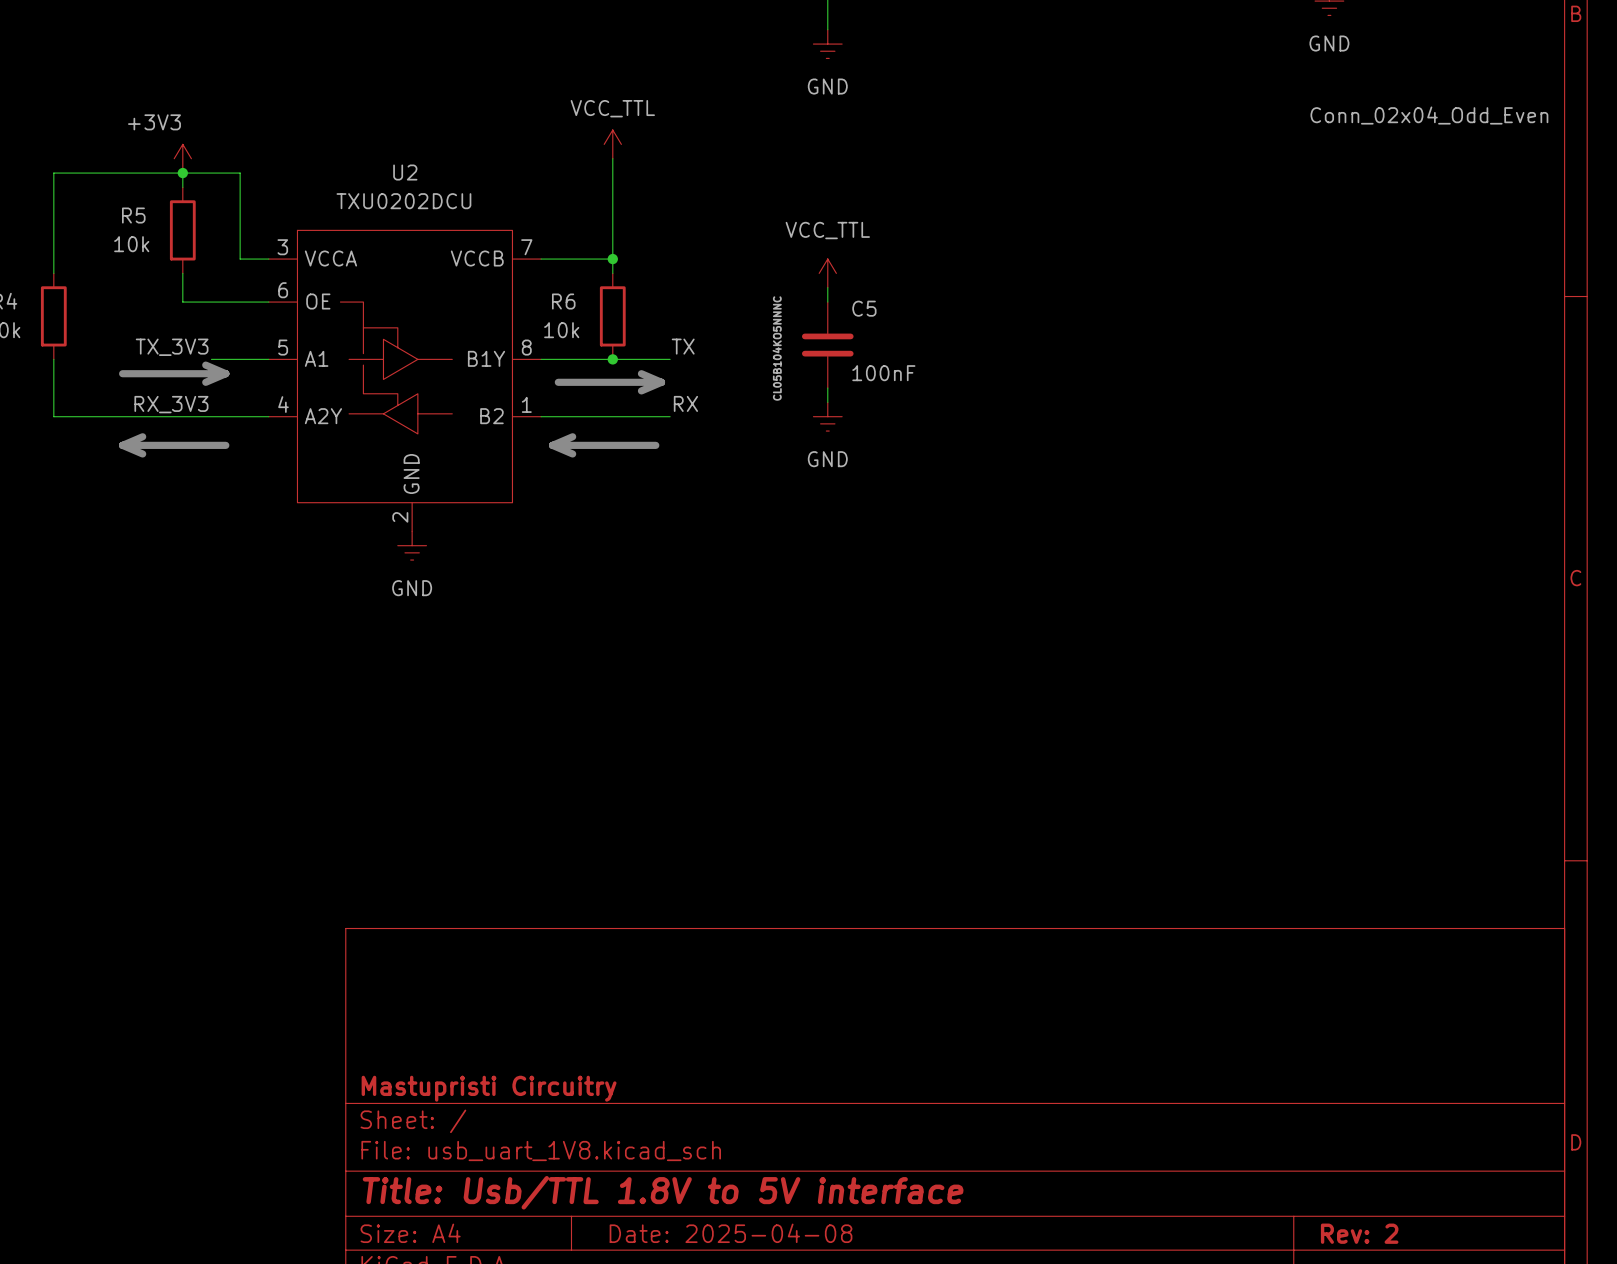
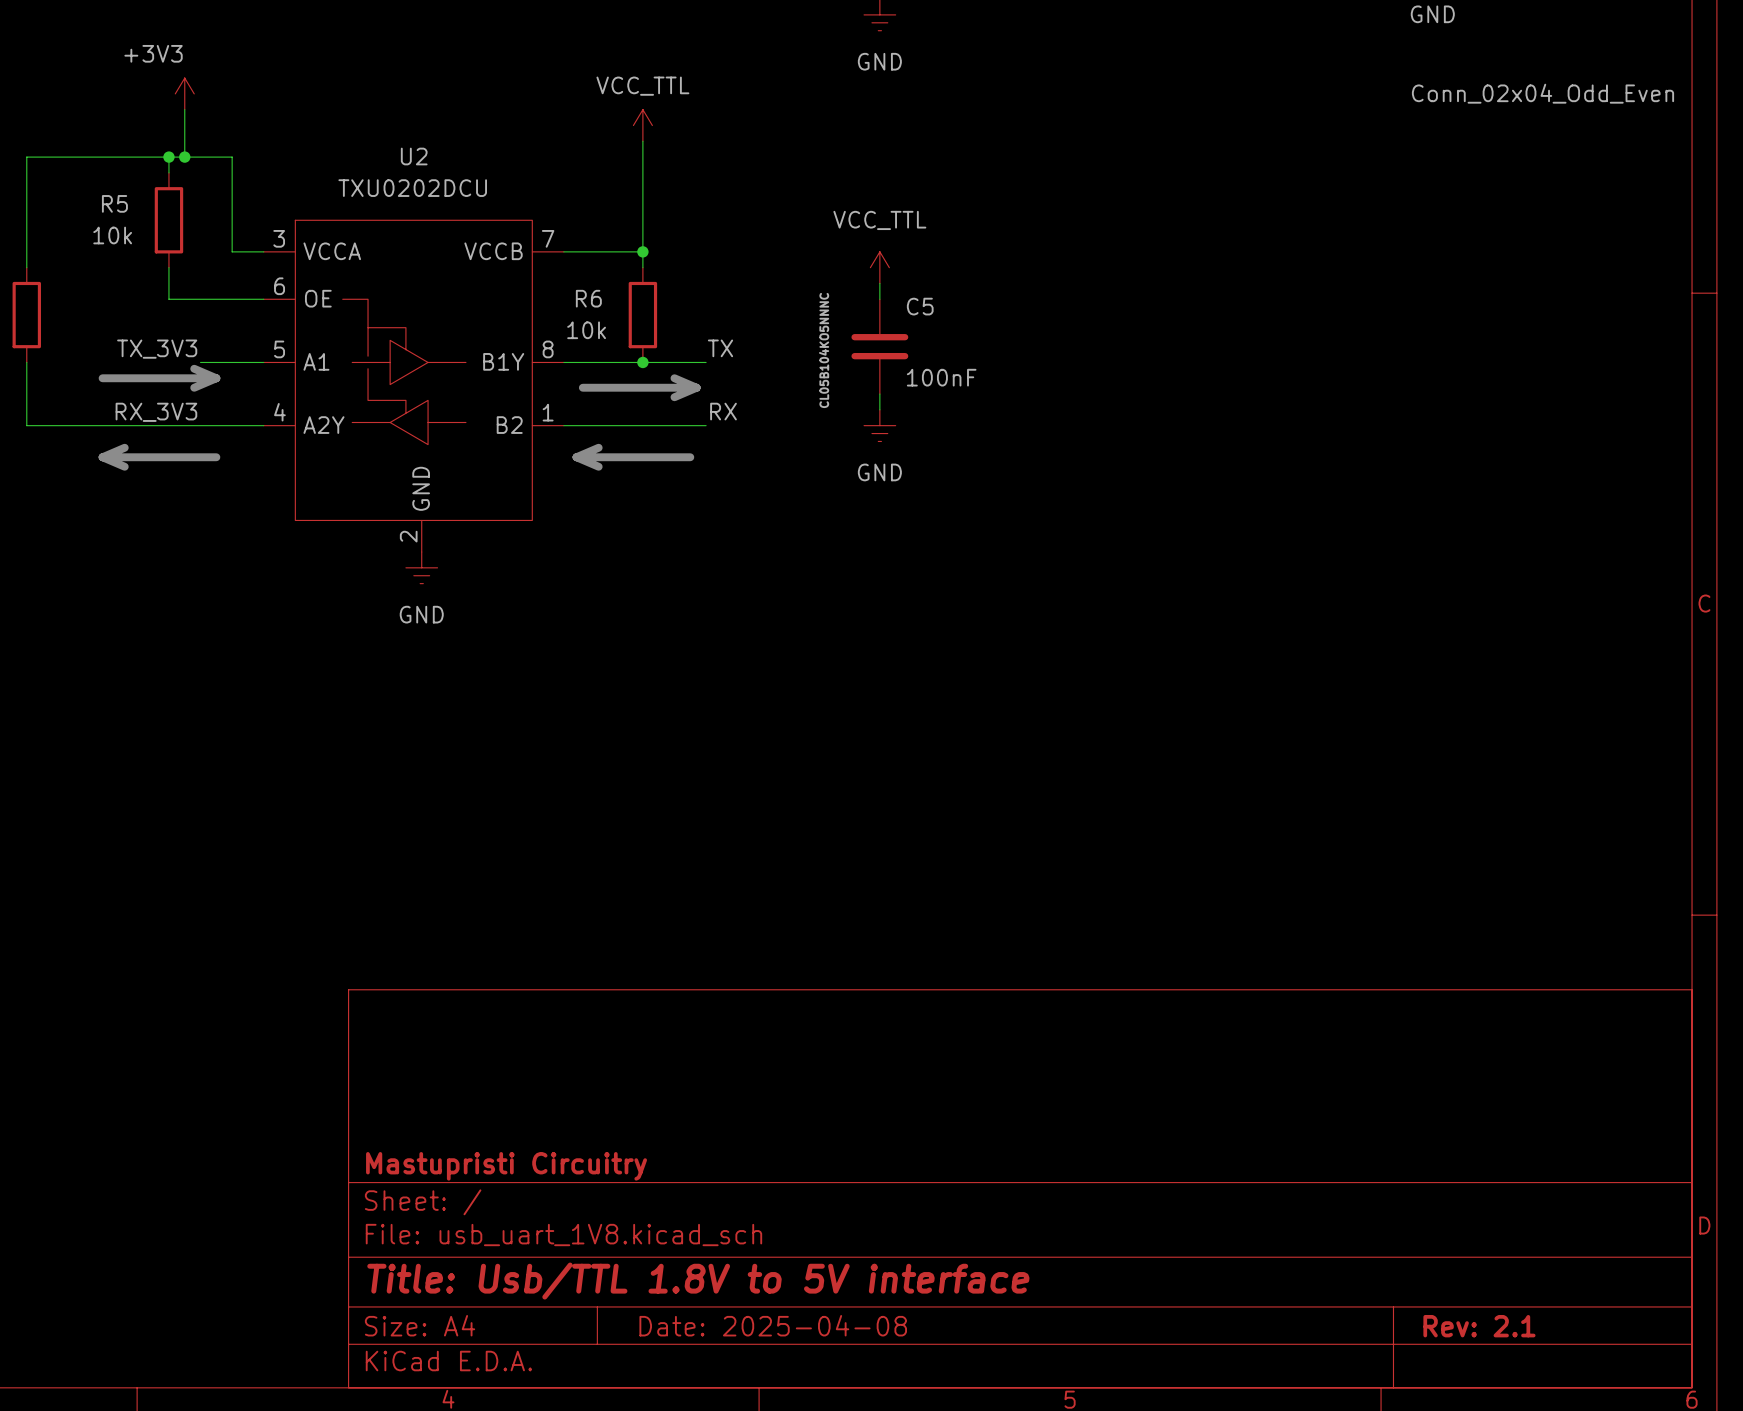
wire: none -> (184, 109) (184, 157)
power symbol position: +3V3 (182, 158) -> +3V3 (184, 93)
junction: none -> (184, 157)
title block: Rev: 2 (1359, 1233) -> Rev: 2.1 (1479, 1326)

